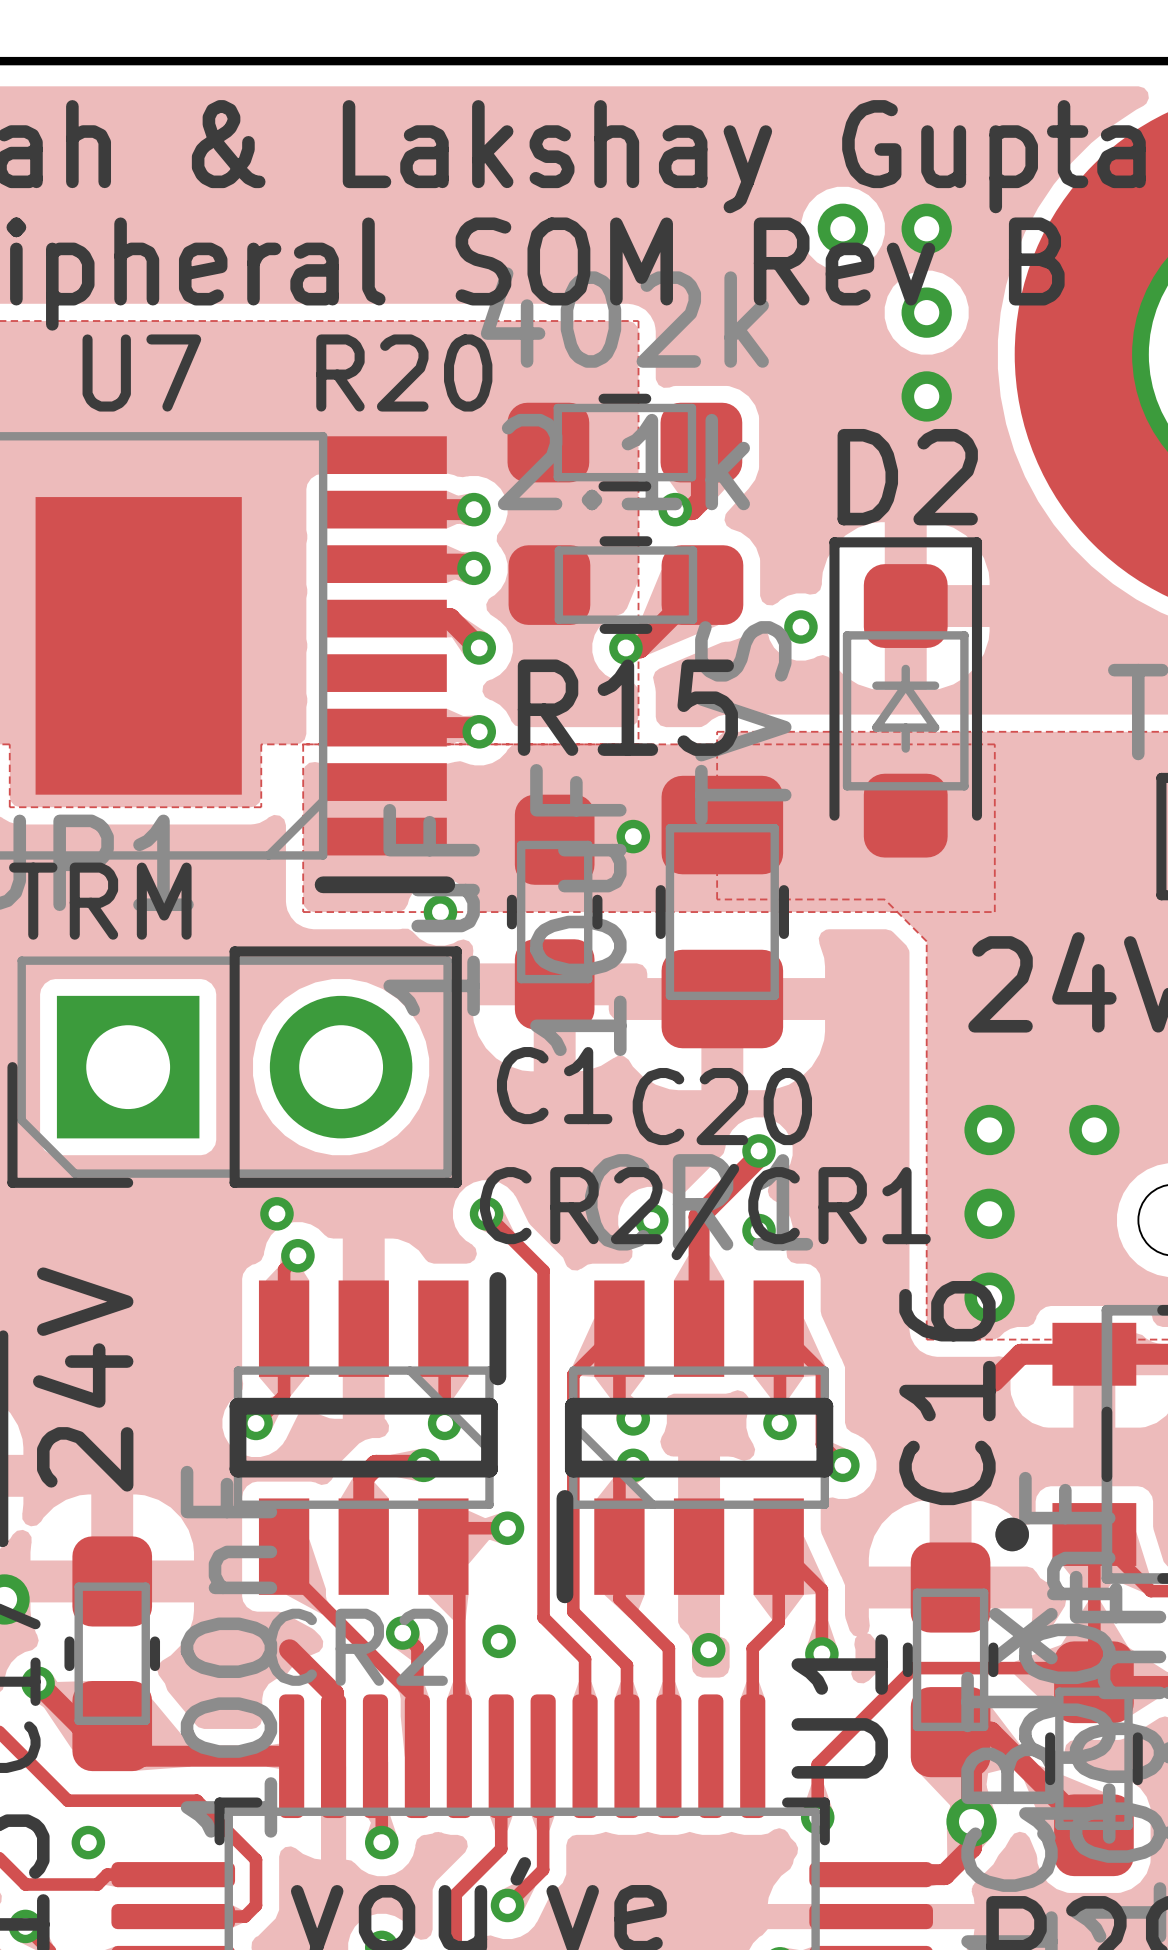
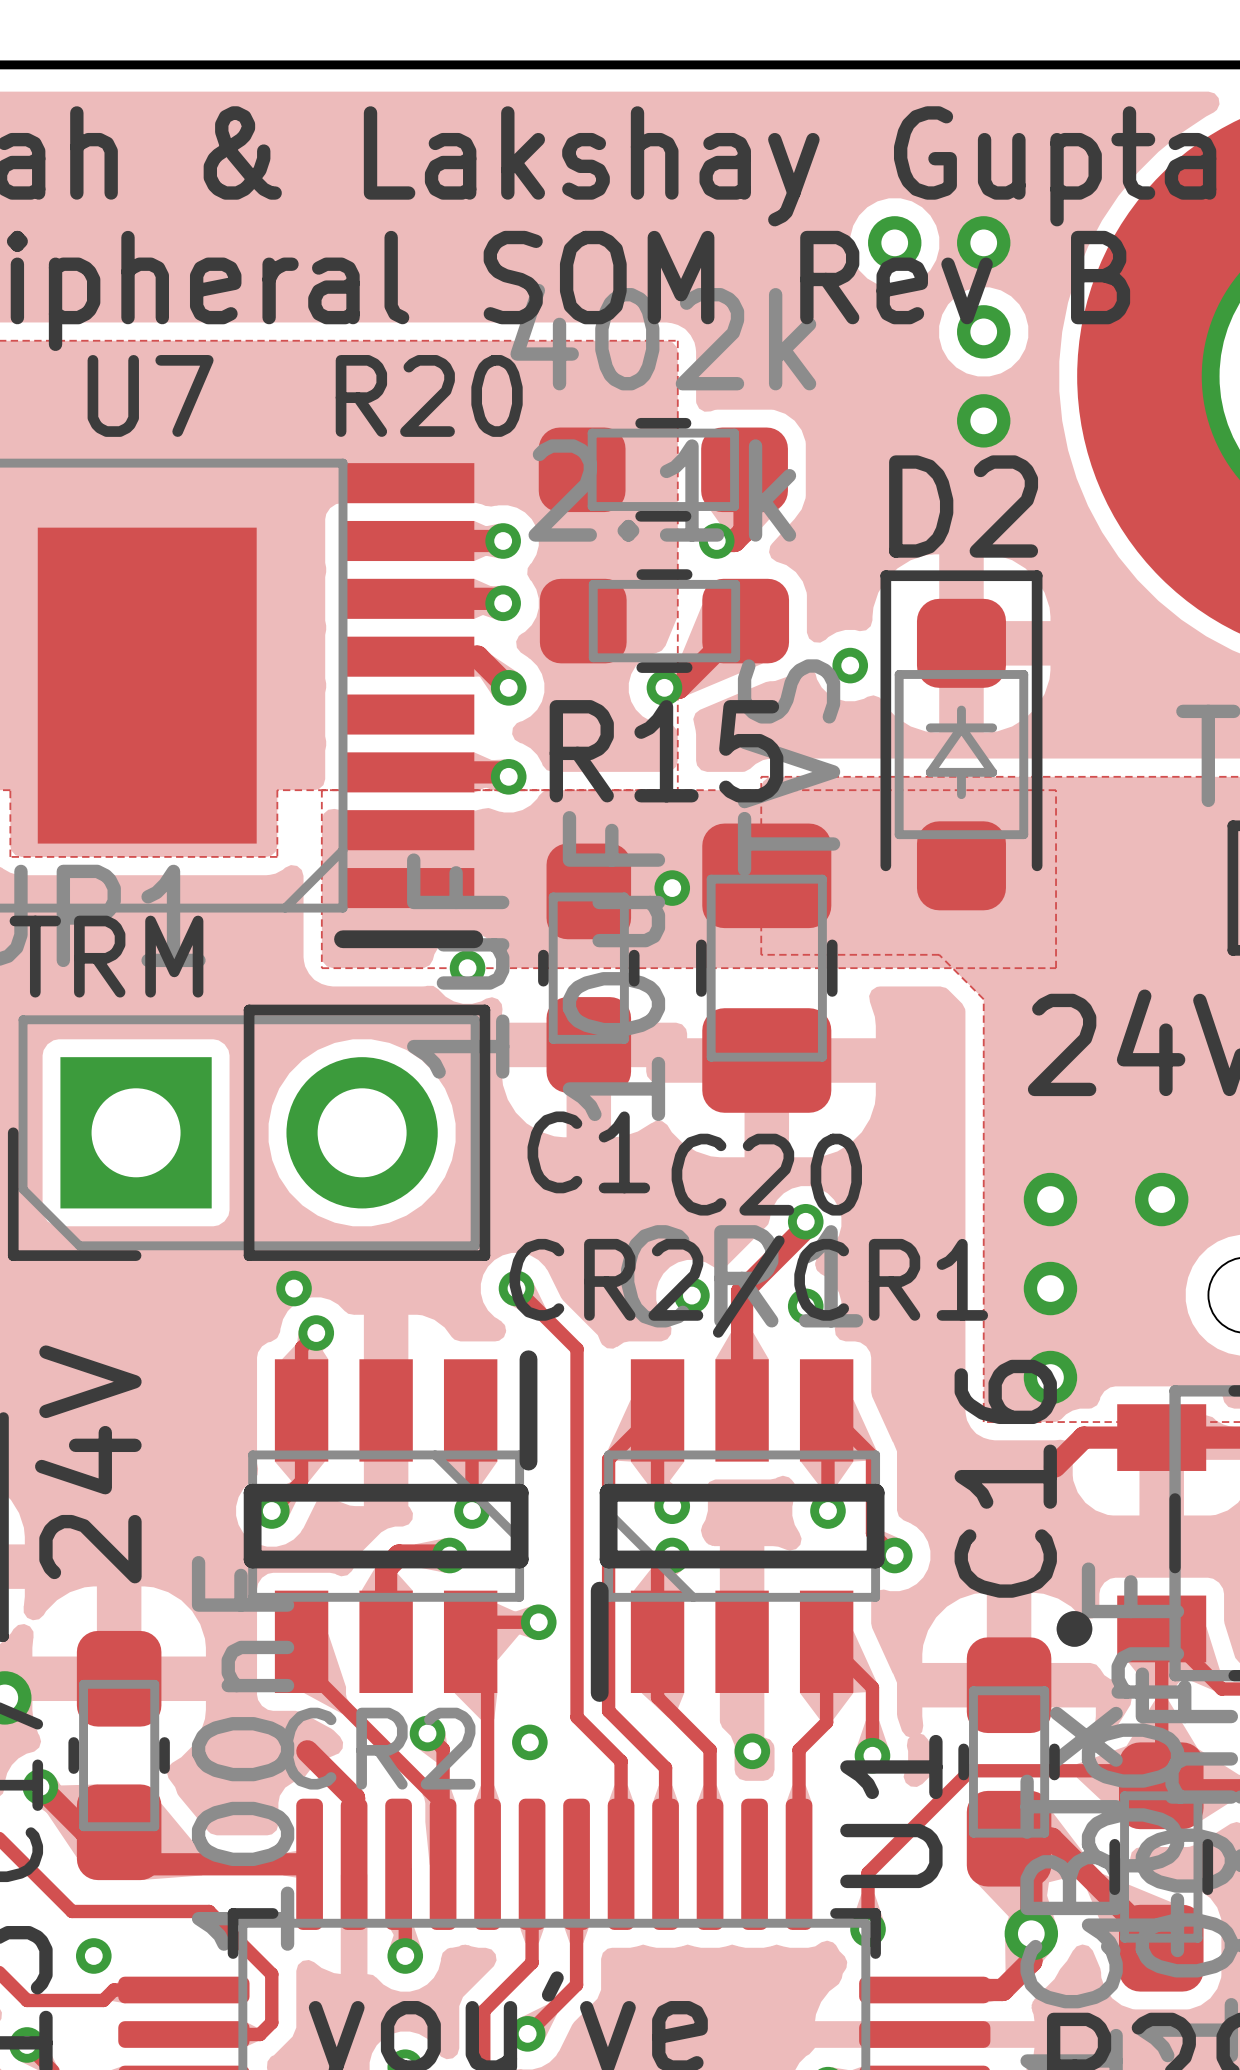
via position: (507, 1905) -> (527, 2033)

